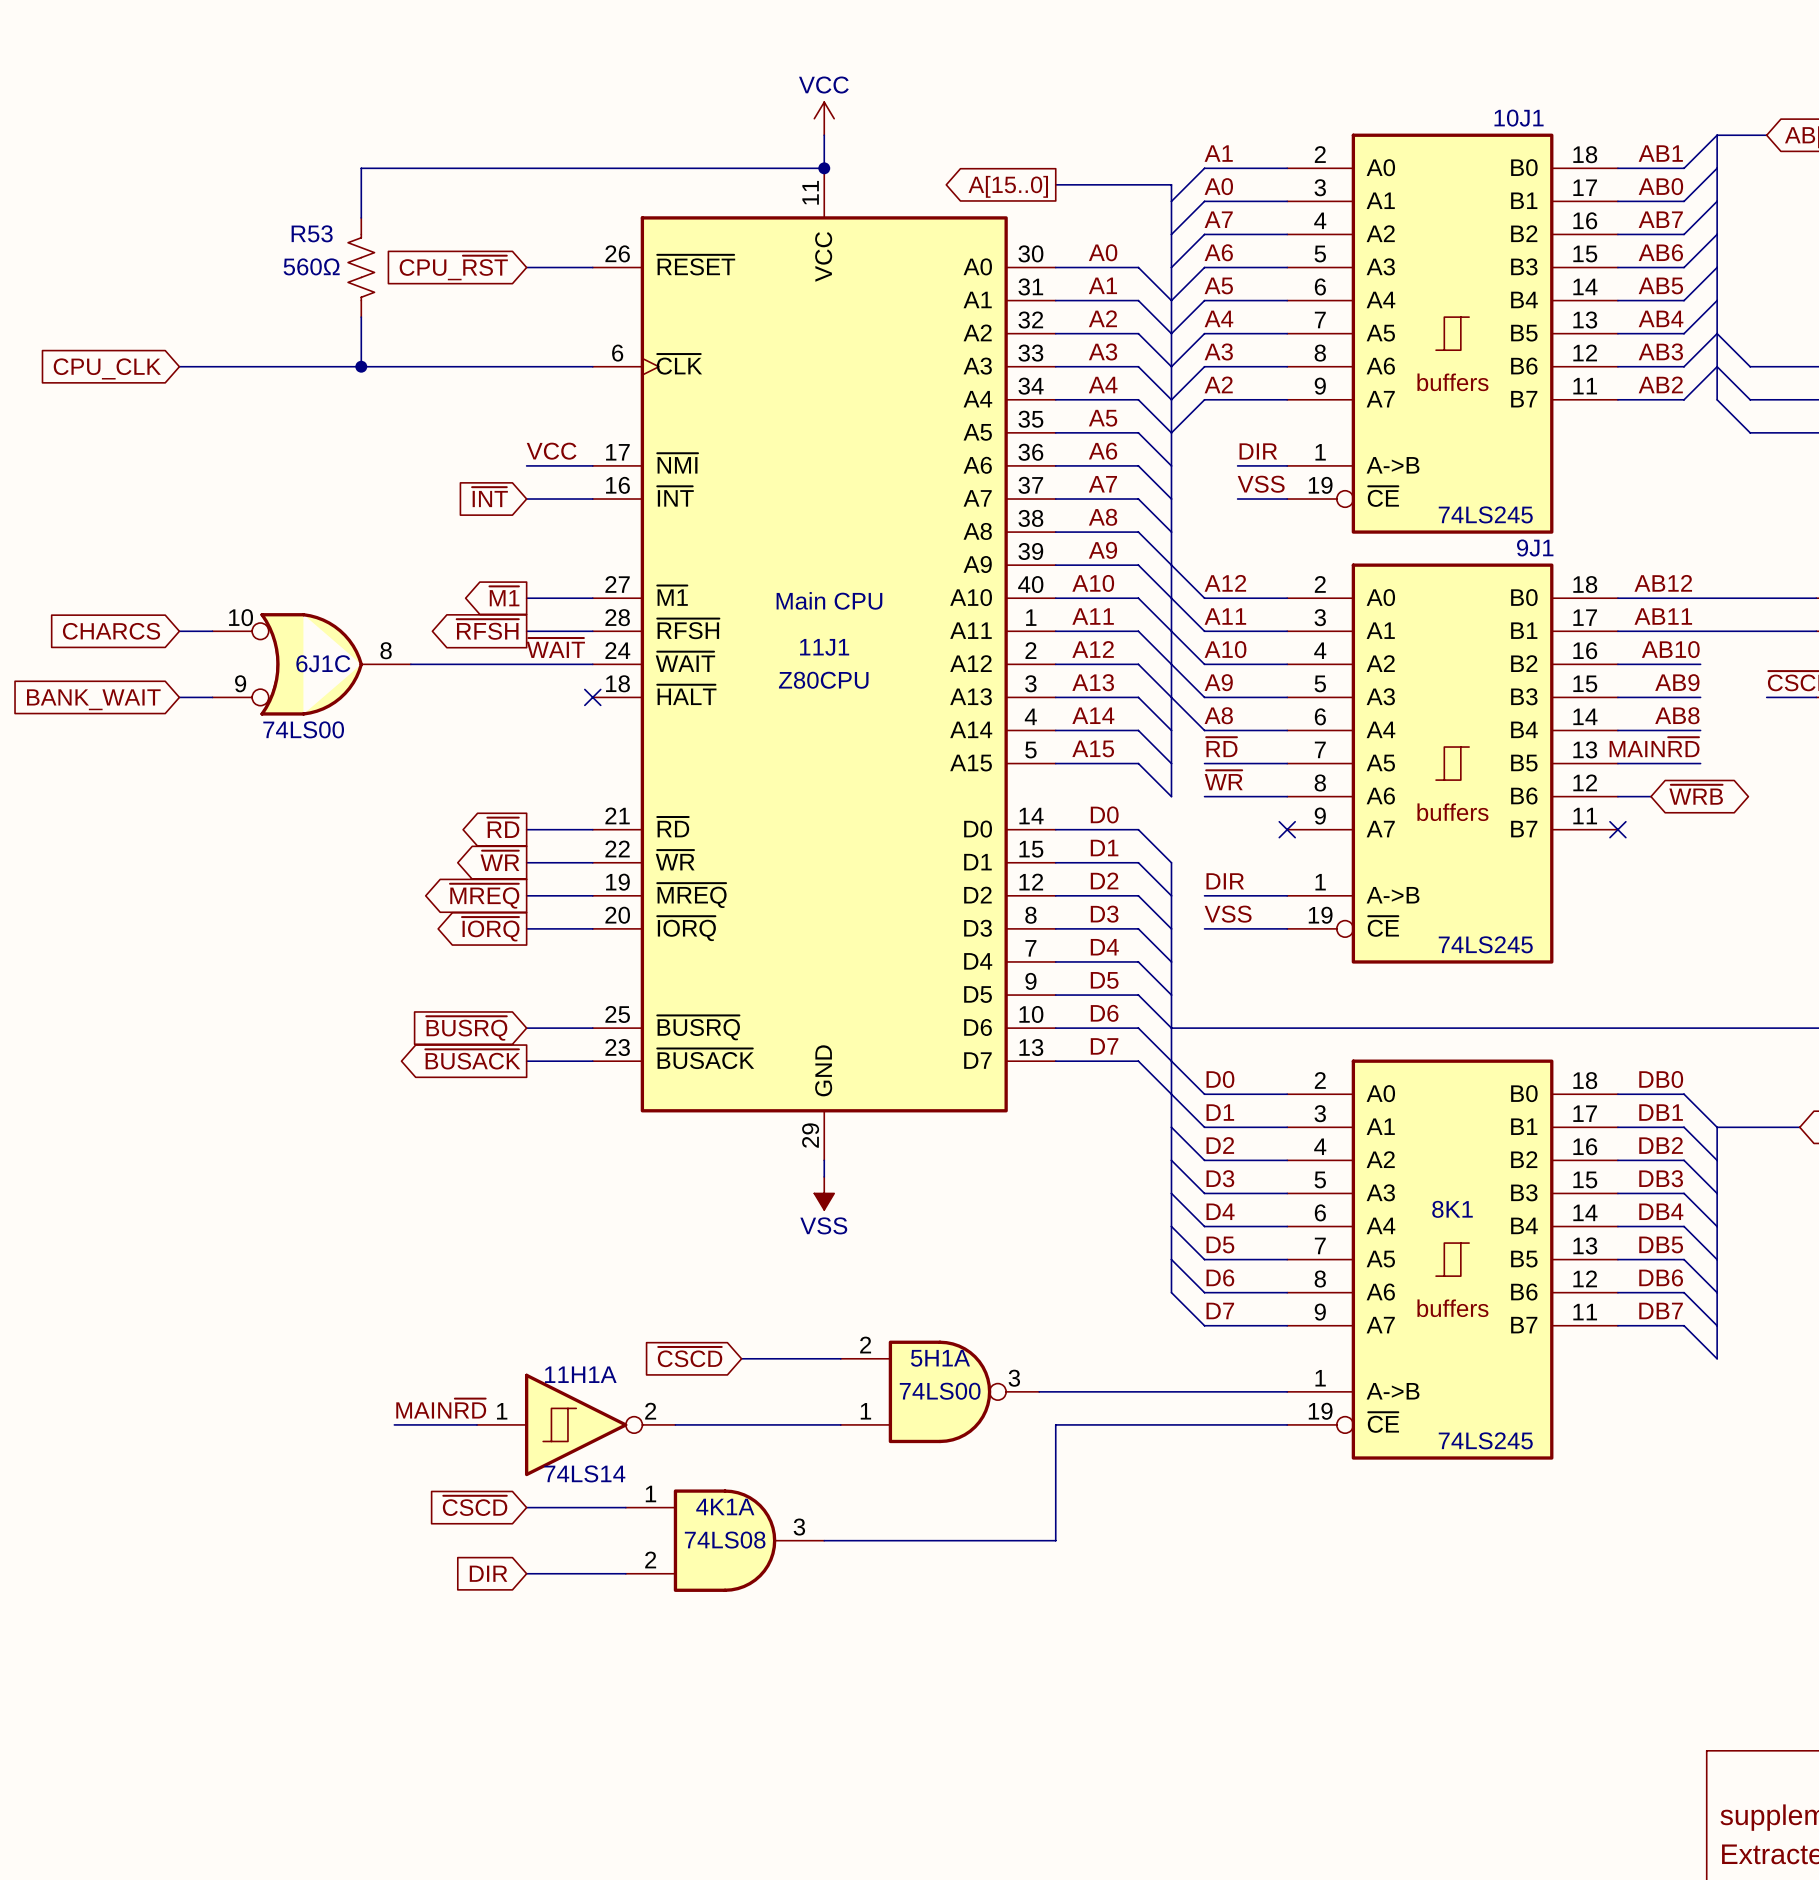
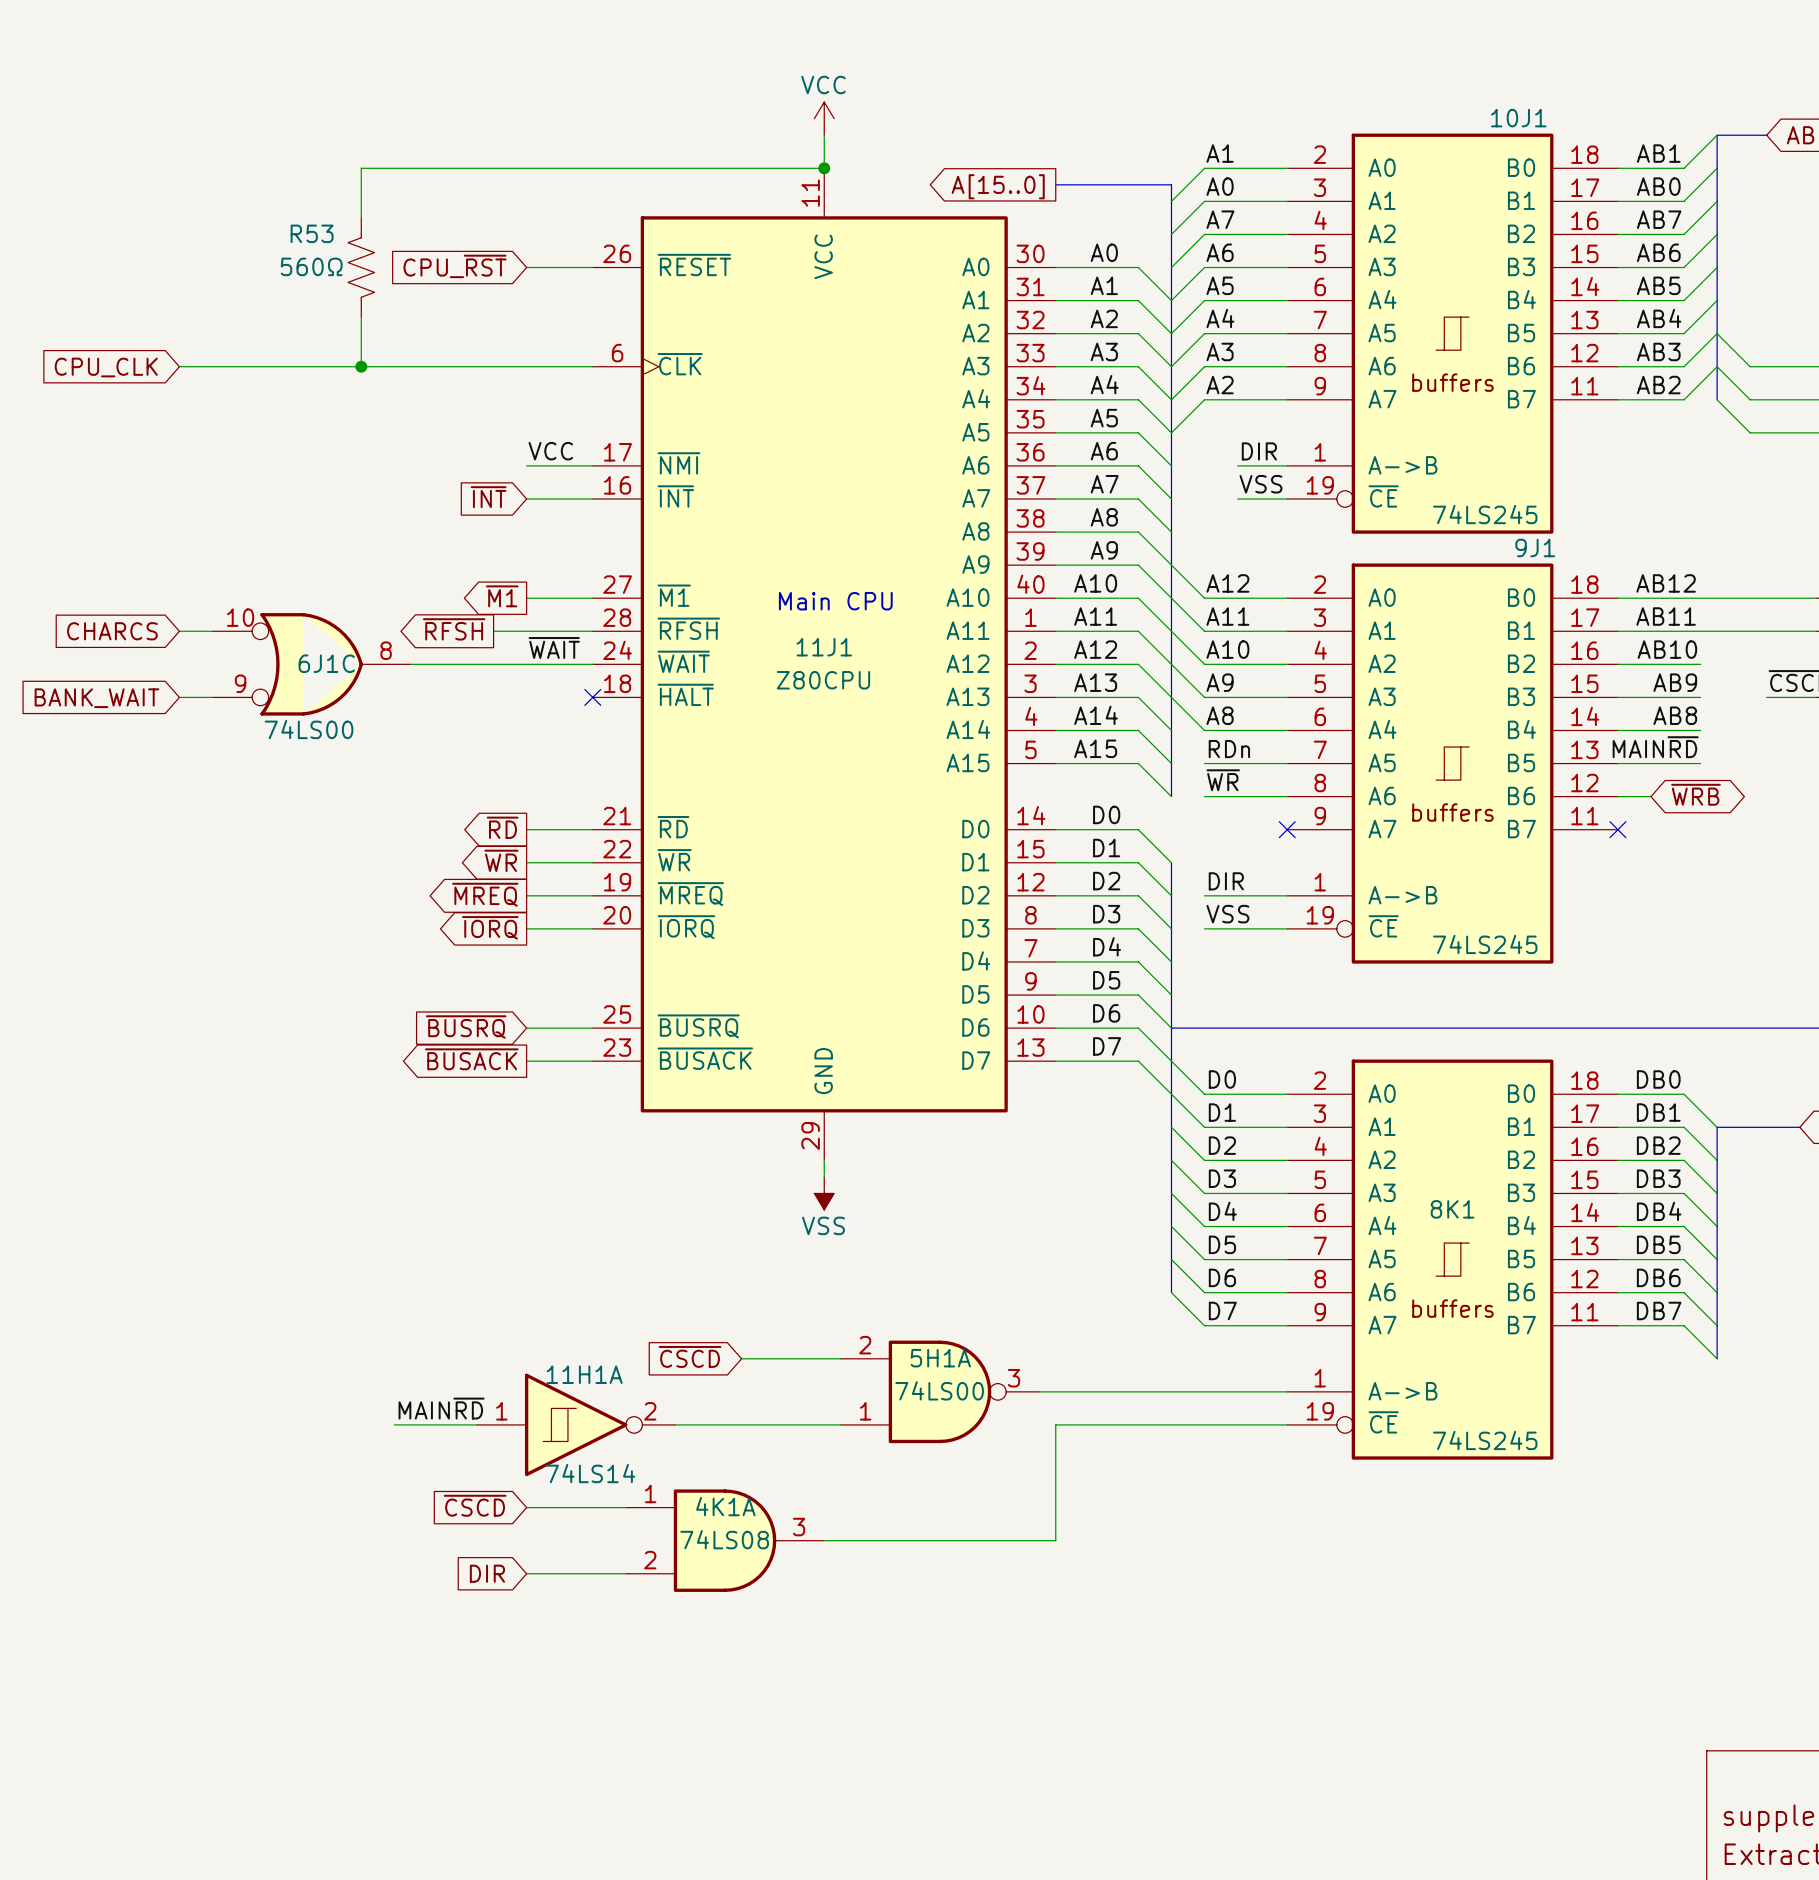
global label position: ~{RFSH} (487, 629) -> ~{RFSH} (454, 629)
wire: none -> (493, 631) (526, 631)
label: ~{RD} (1221, 747) -> RDn (1229, 749)

